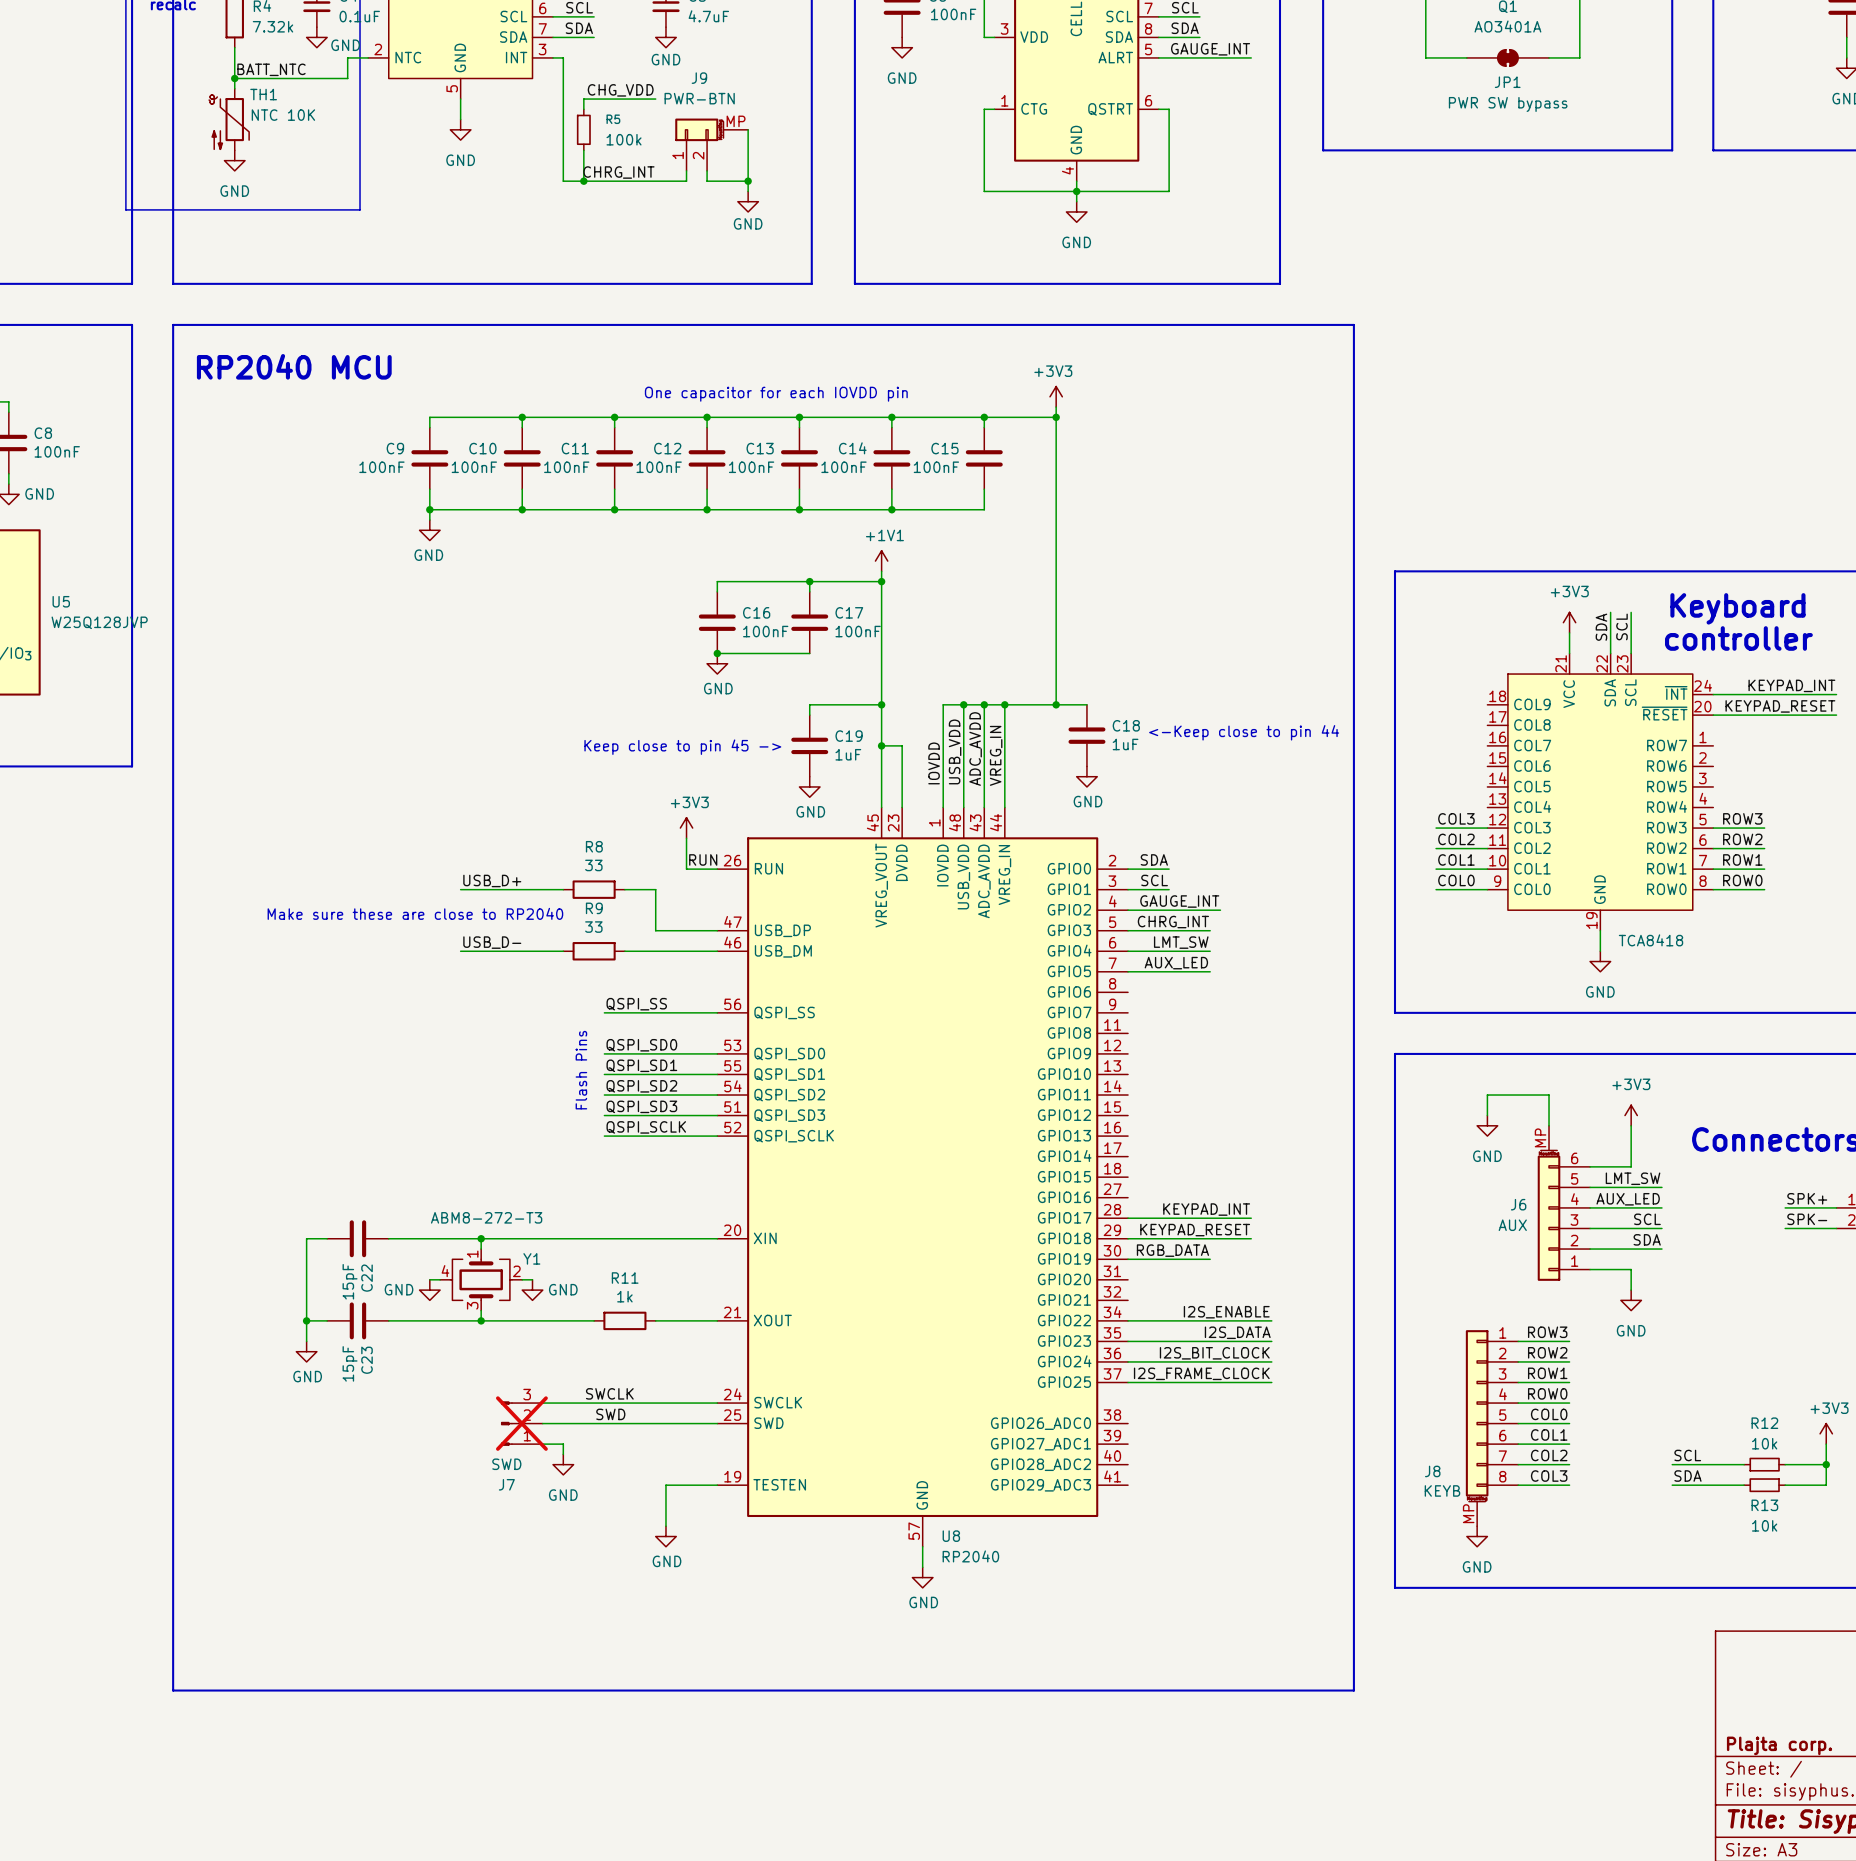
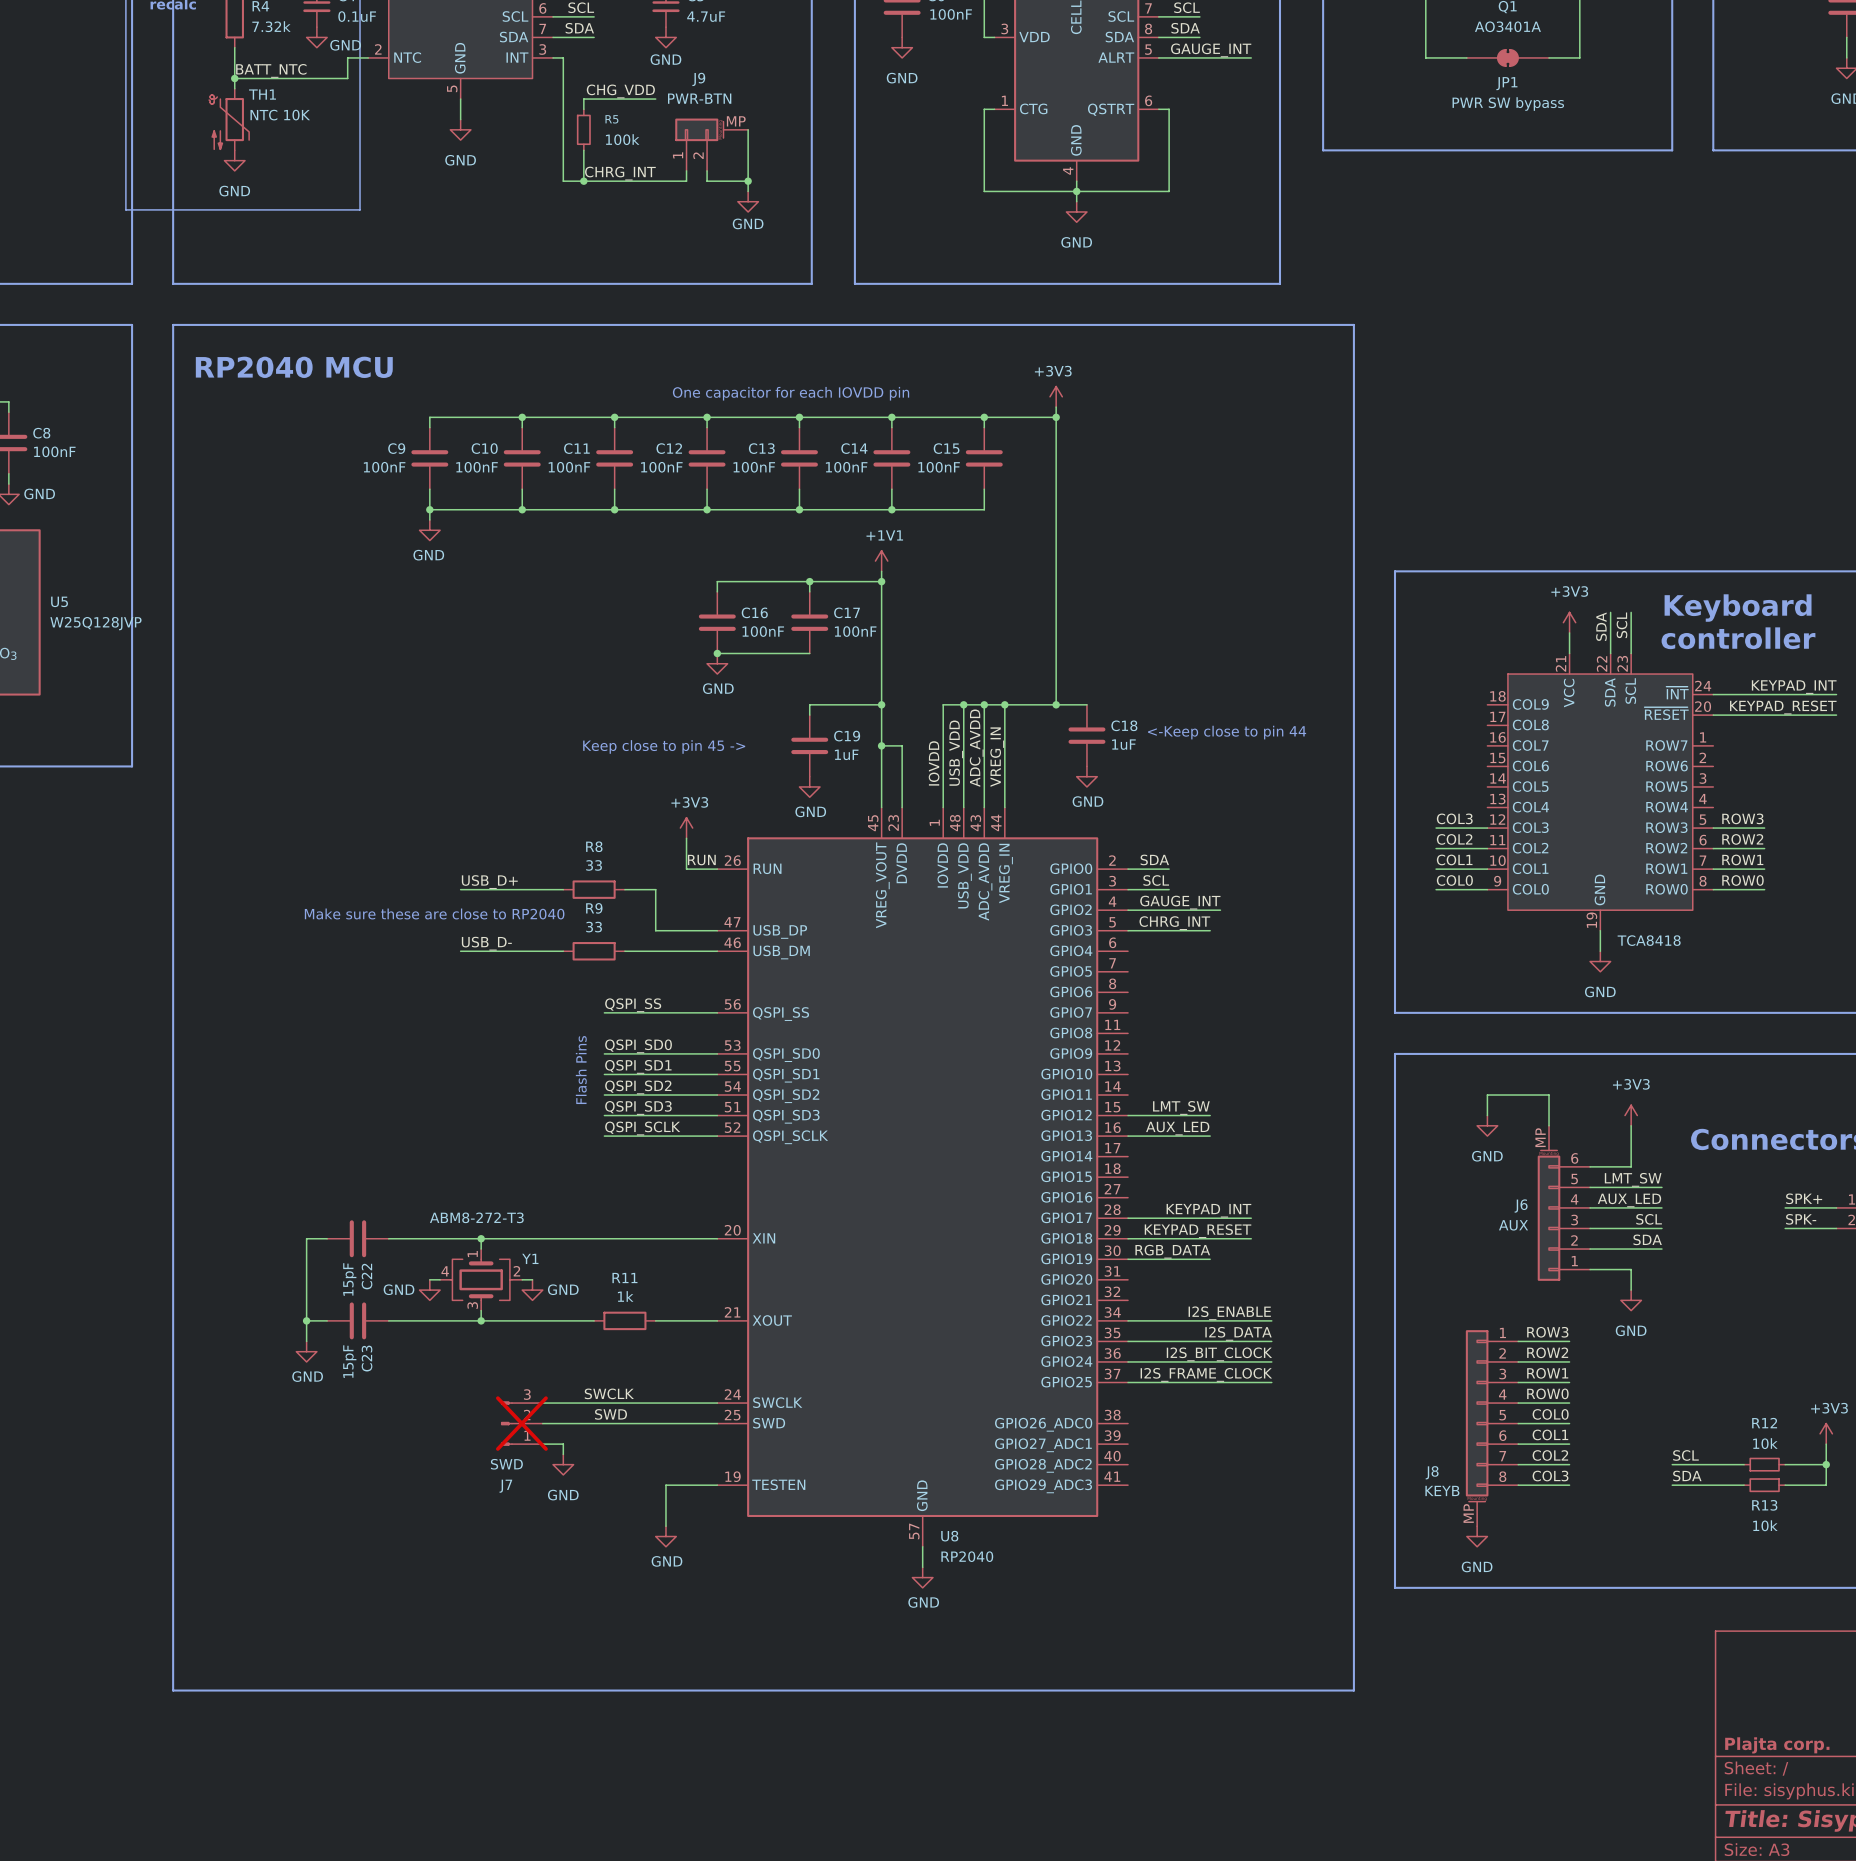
label position: LMT_SW (1181, 942) -> LMT_SW (1181, 1107)
wire: (1128, 951) (1210, 951) -> (1128, 1136) (1210, 1136)
label position: AUX_LED (1176, 963) -> AUX_LED (1177, 1128)
wire: (1128, 971) (1210, 971) -> (1128, 1115) (1210, 1115)

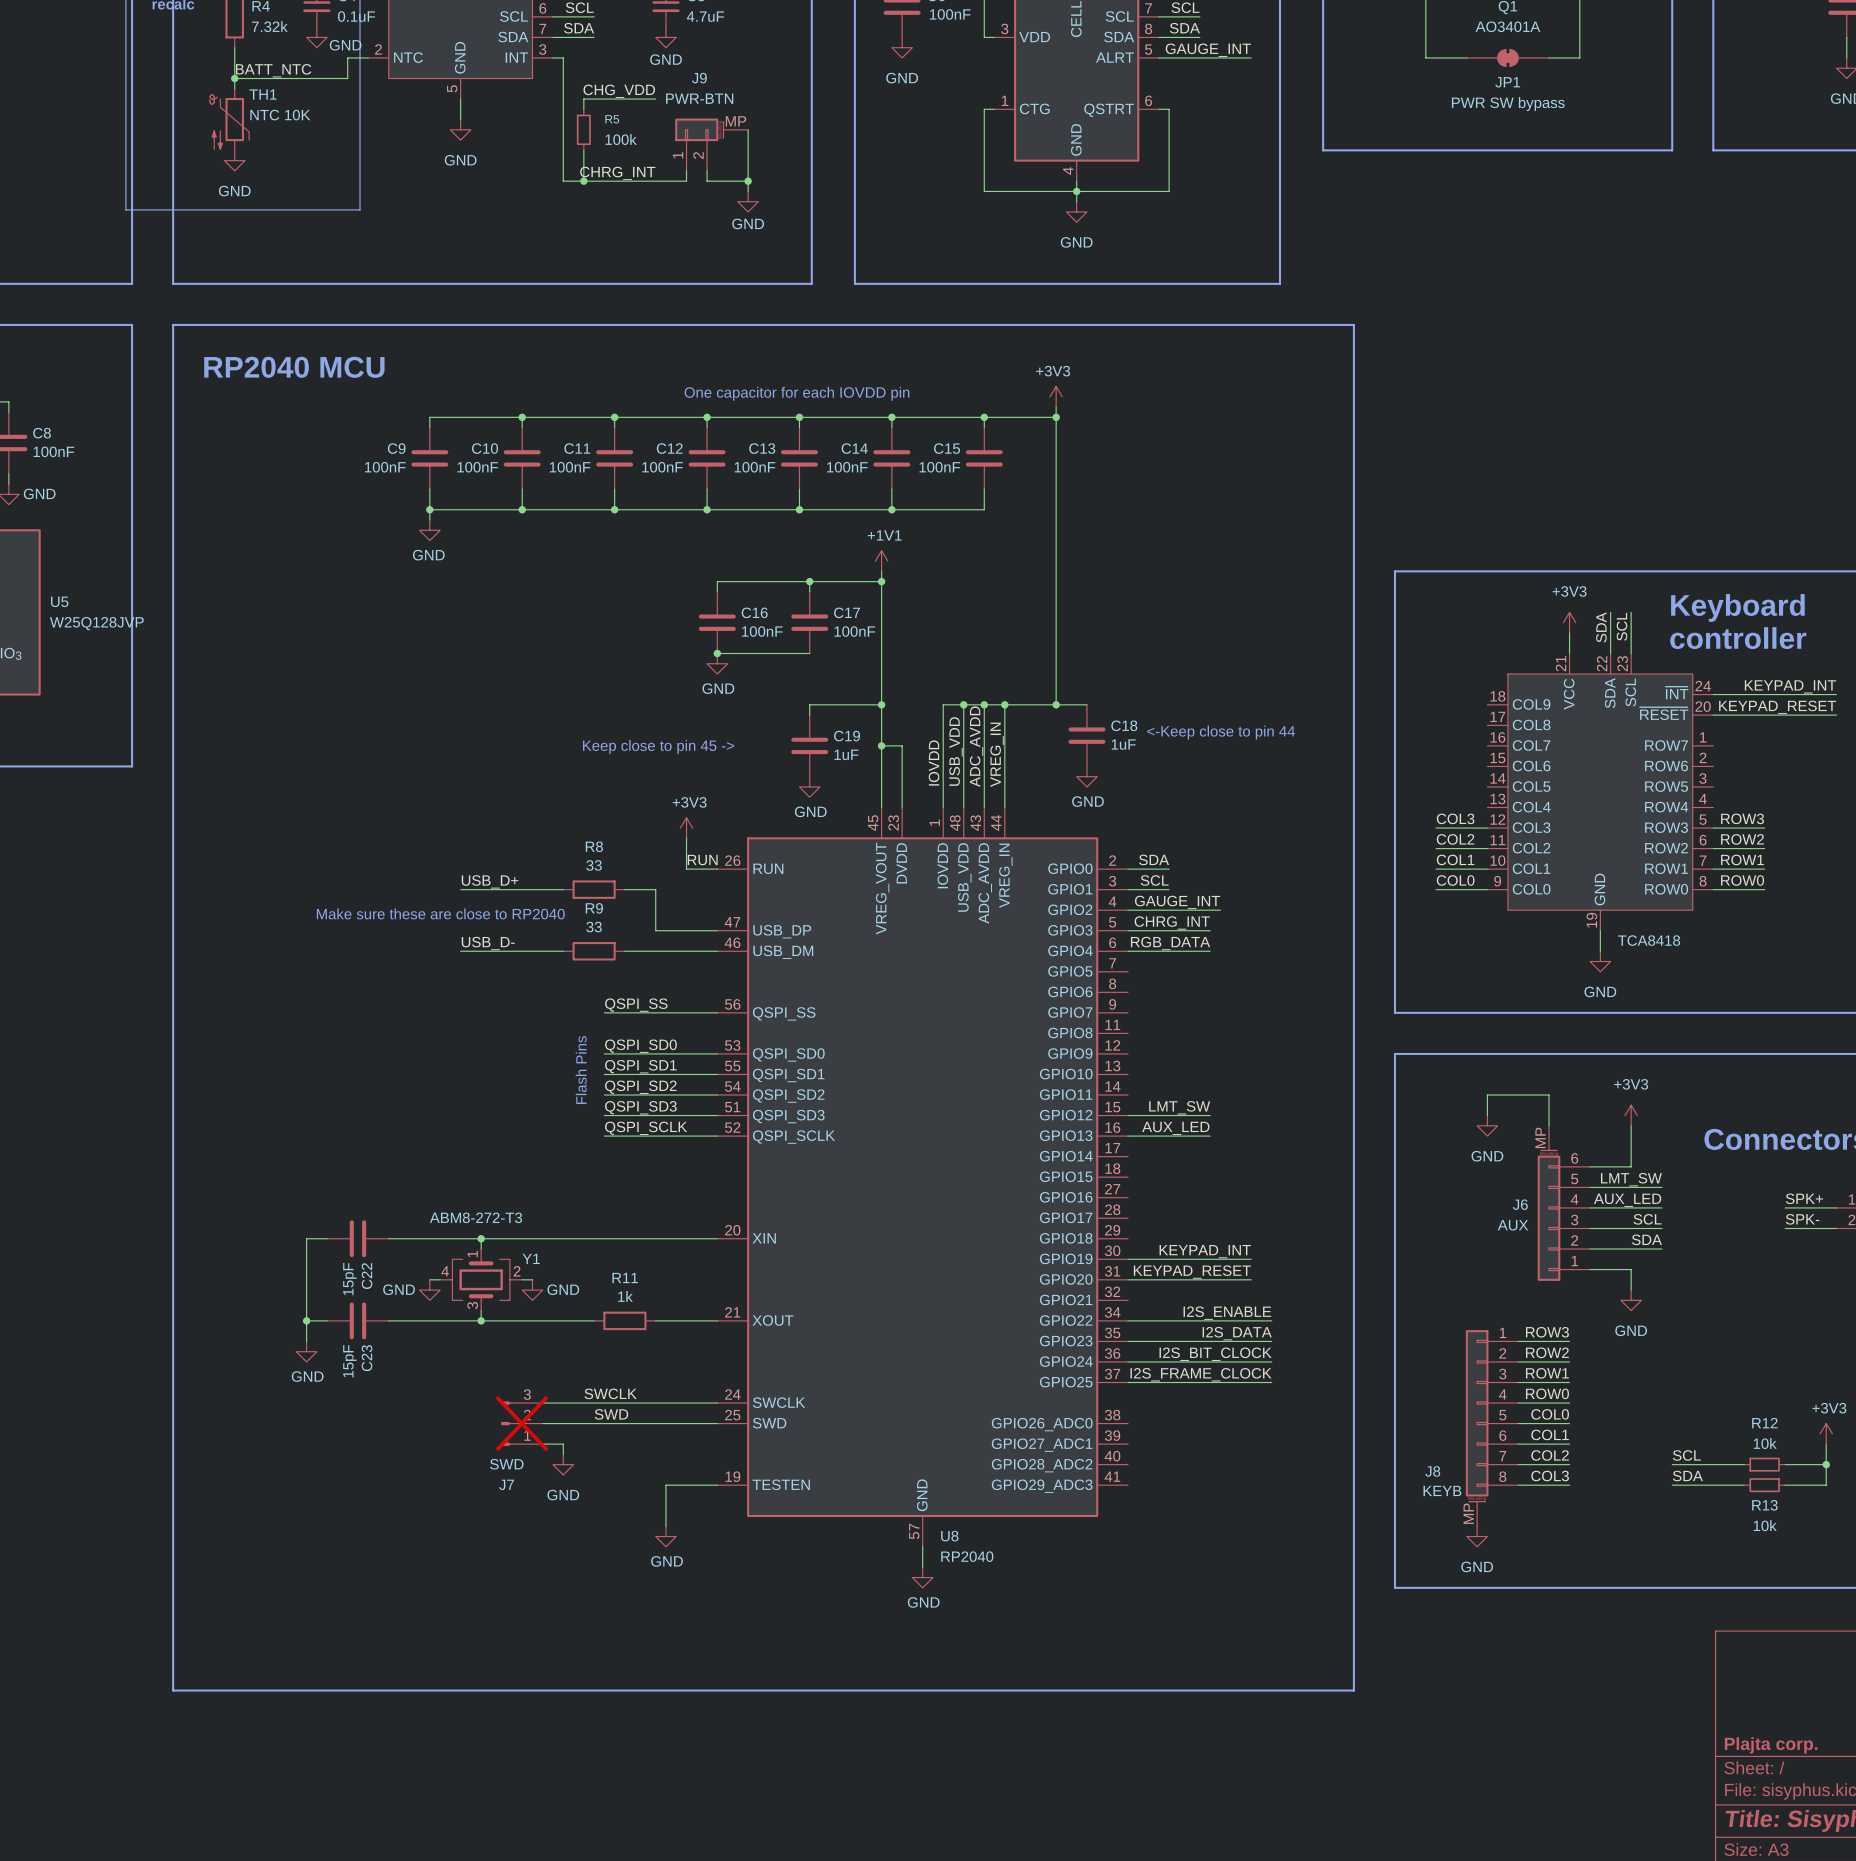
label: none -> RGB_DATA (1170, 943)
wire: none -> (1128, 951) (1210, 951)
label position: KEYPAD_INT (1208, 1210) -> KEYPAD_INT (1205, 1251)
wire: (1128, 1218) (1251, 1218) -> none
label position: KEYPAD_RESET (1198, 1231) -> KEYPAD_RESET (1192, 1272)
wire: (1128, 1238) (1251, 1238) -> (1128, 1279) (1251, 1279)
label: RGB_DATA (1172, 1251) -> none
wire: none -> (1210, 1259) (1251, 1259)

